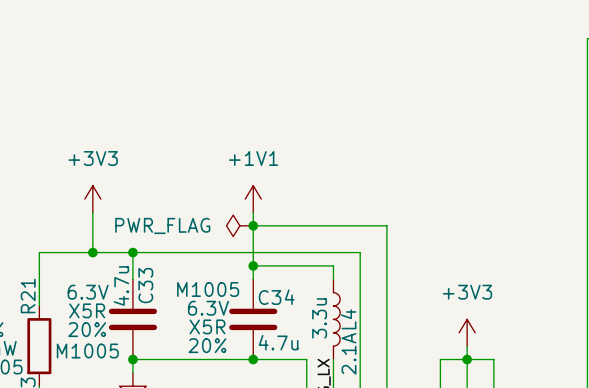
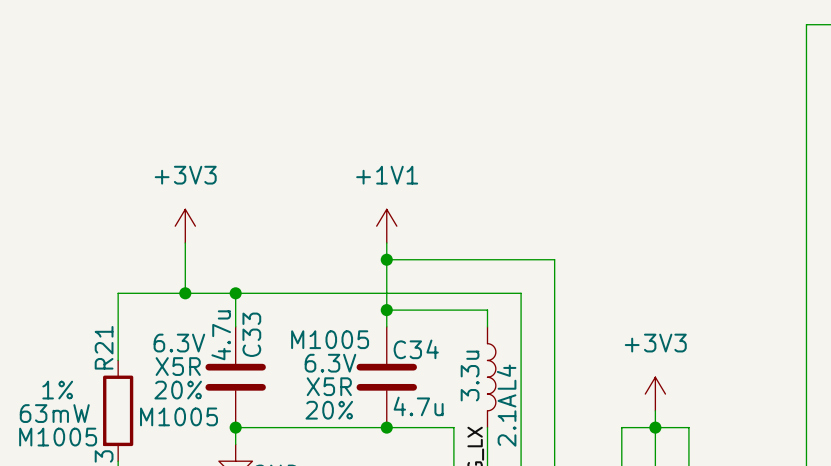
power symbol: PWR_FLAG (239, 225) -> none

